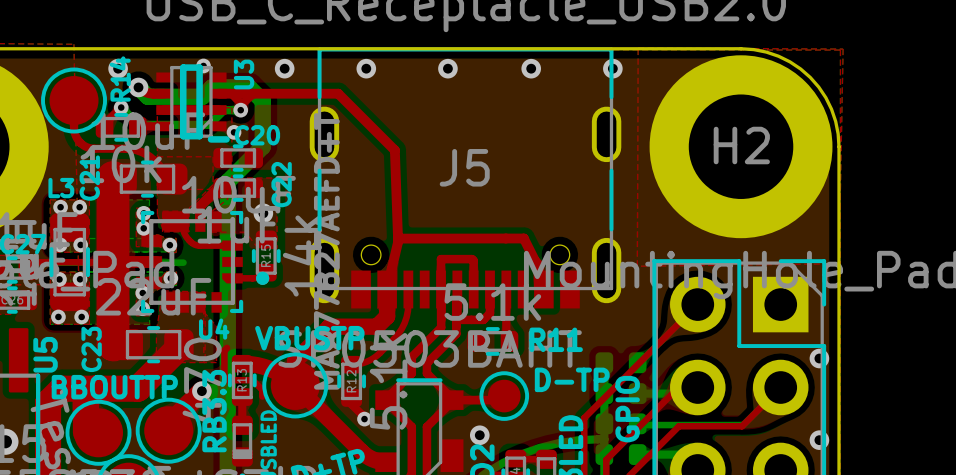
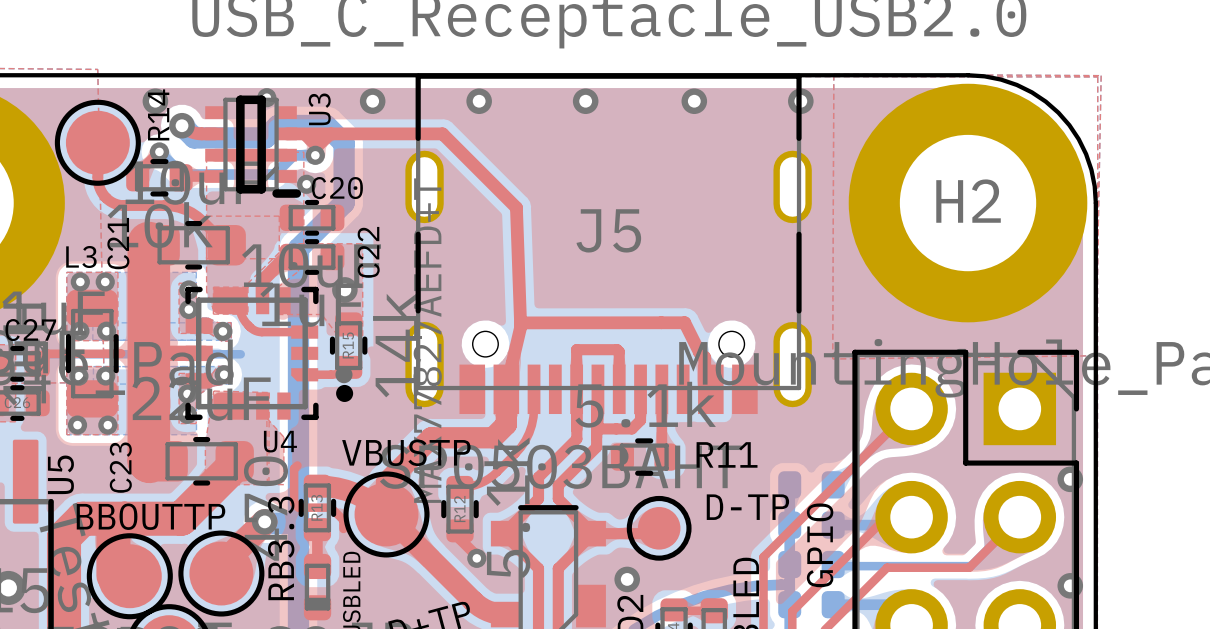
U4 footprint: [141, 210, 270, 314] -> [185, 286, 354, 421]

